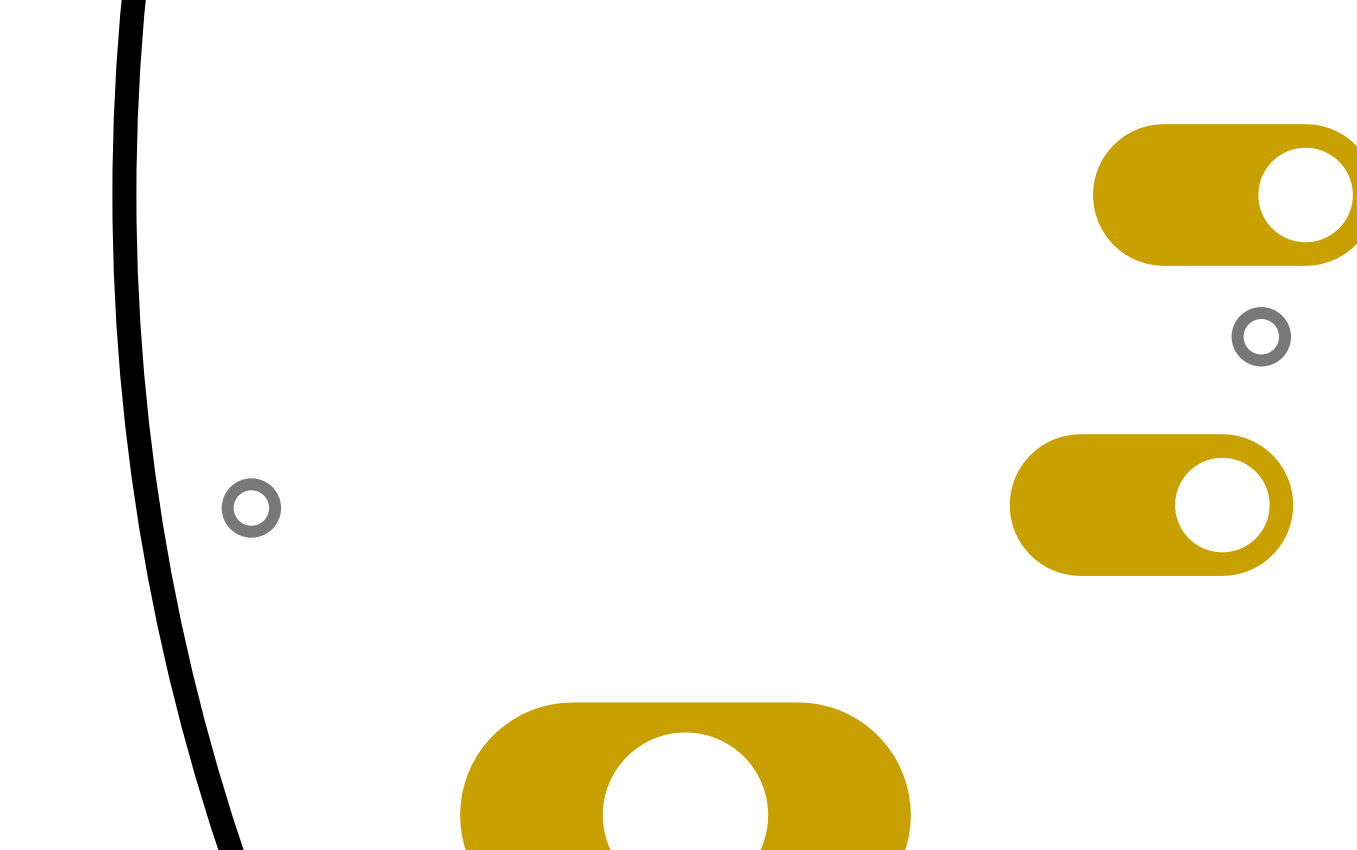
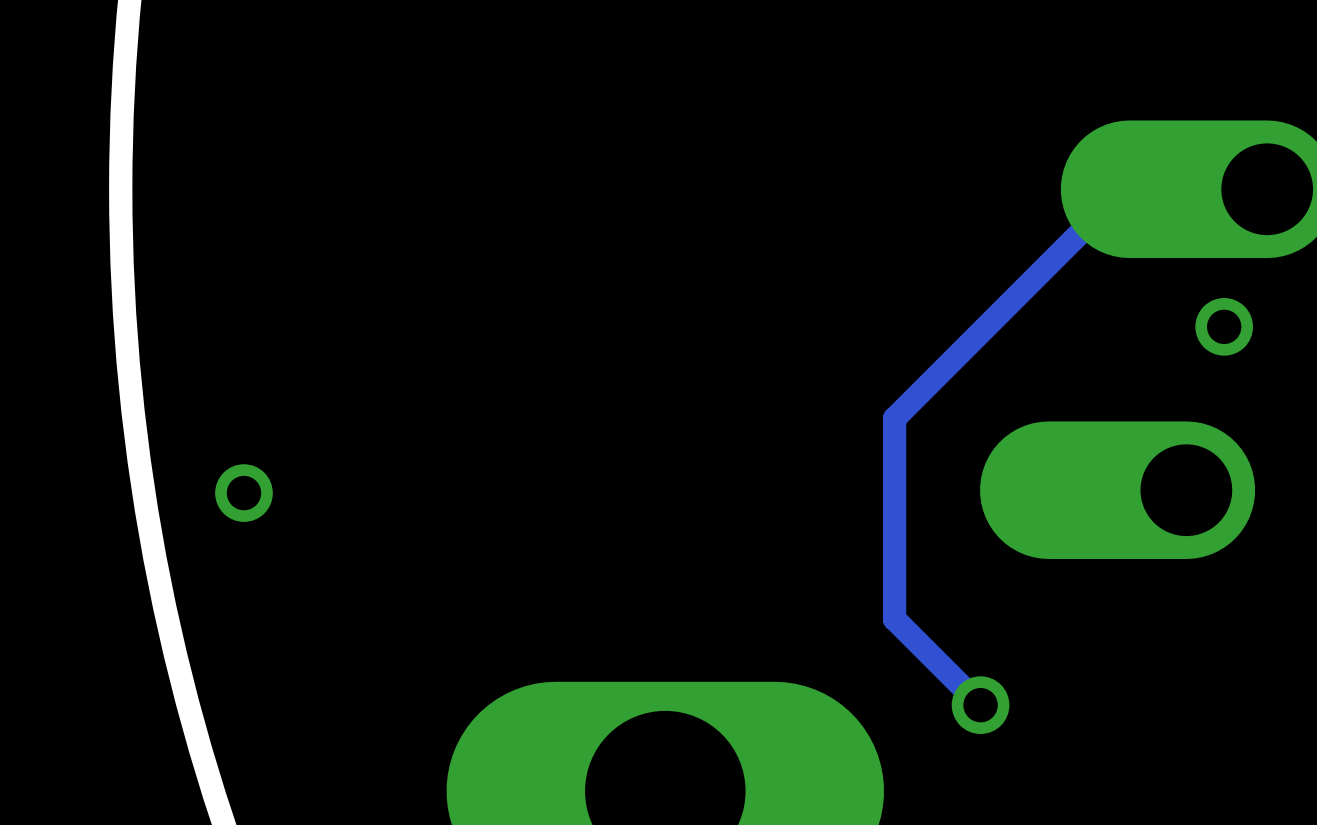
track: none -> (1267, 189) (1123, 189) (894, 418) (894, 619) (980, 705)
via: none -> (980, 705)

